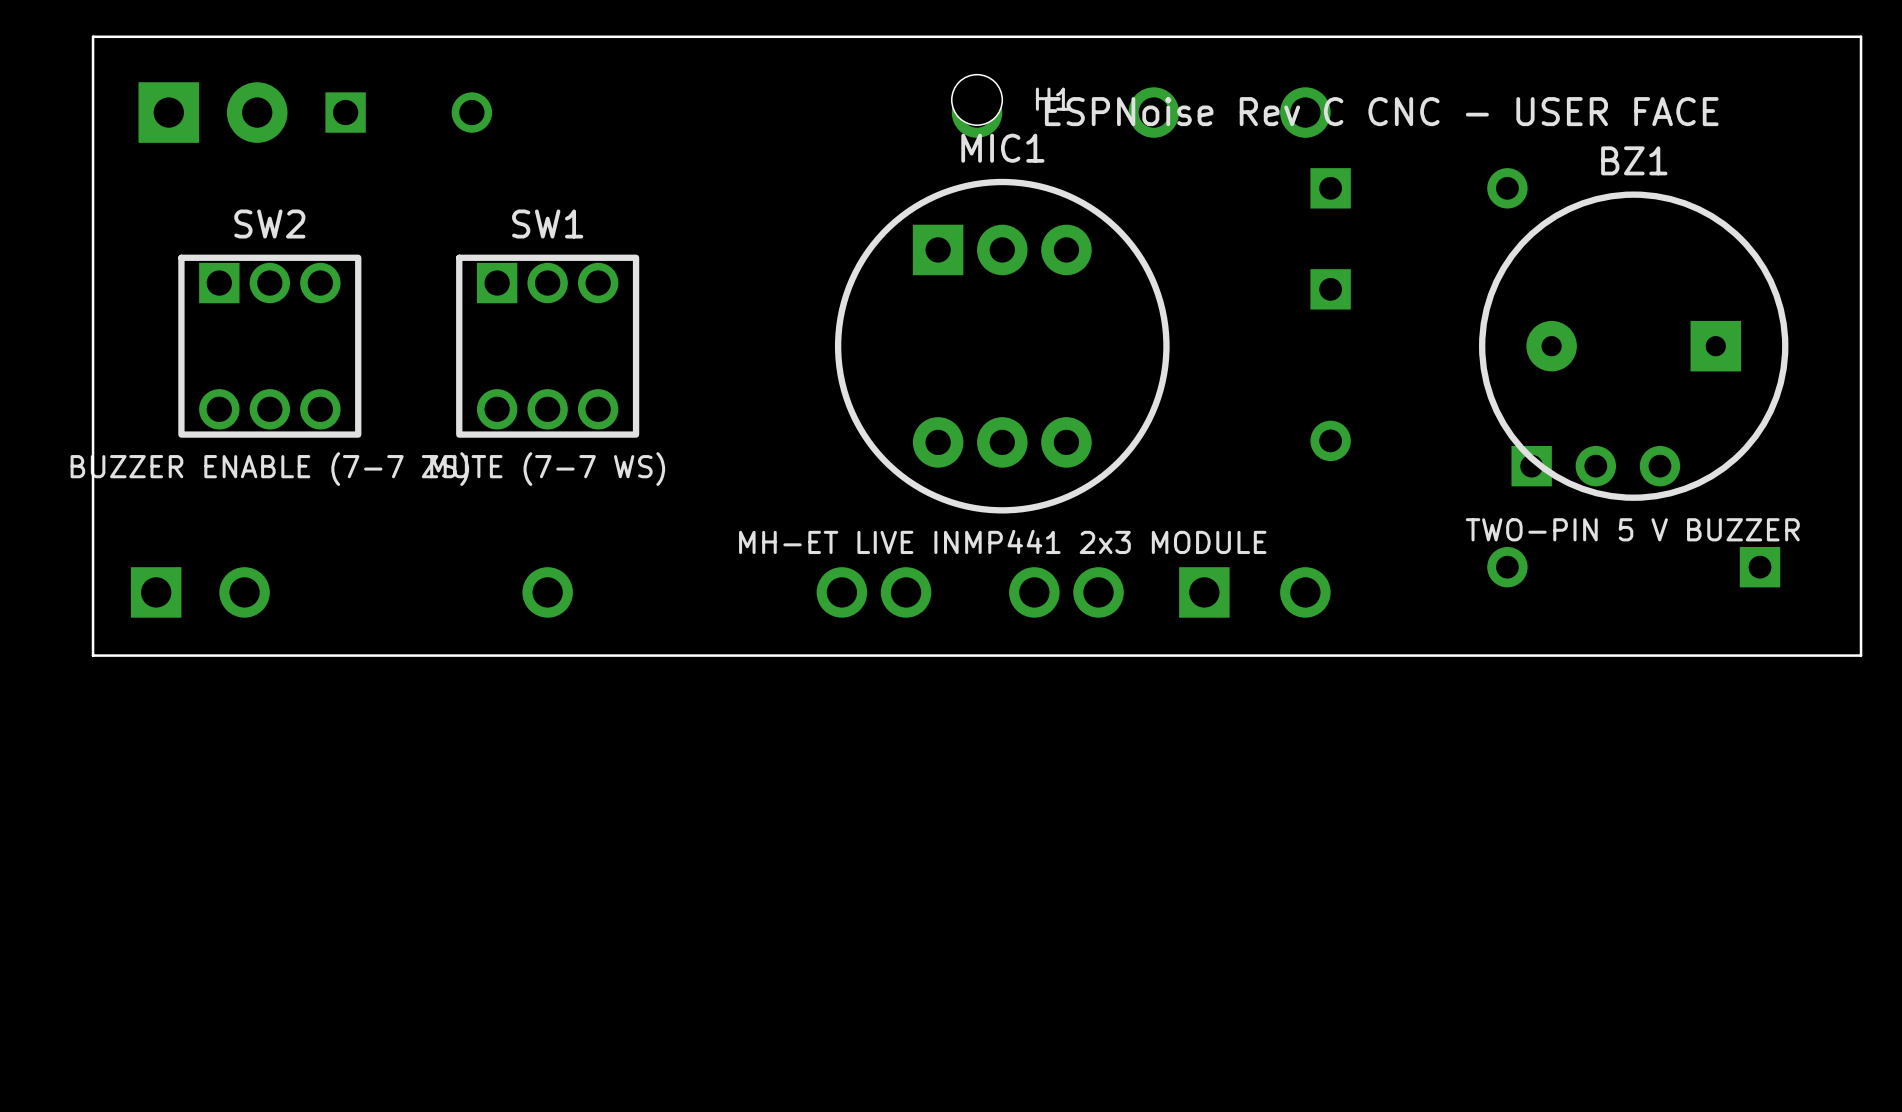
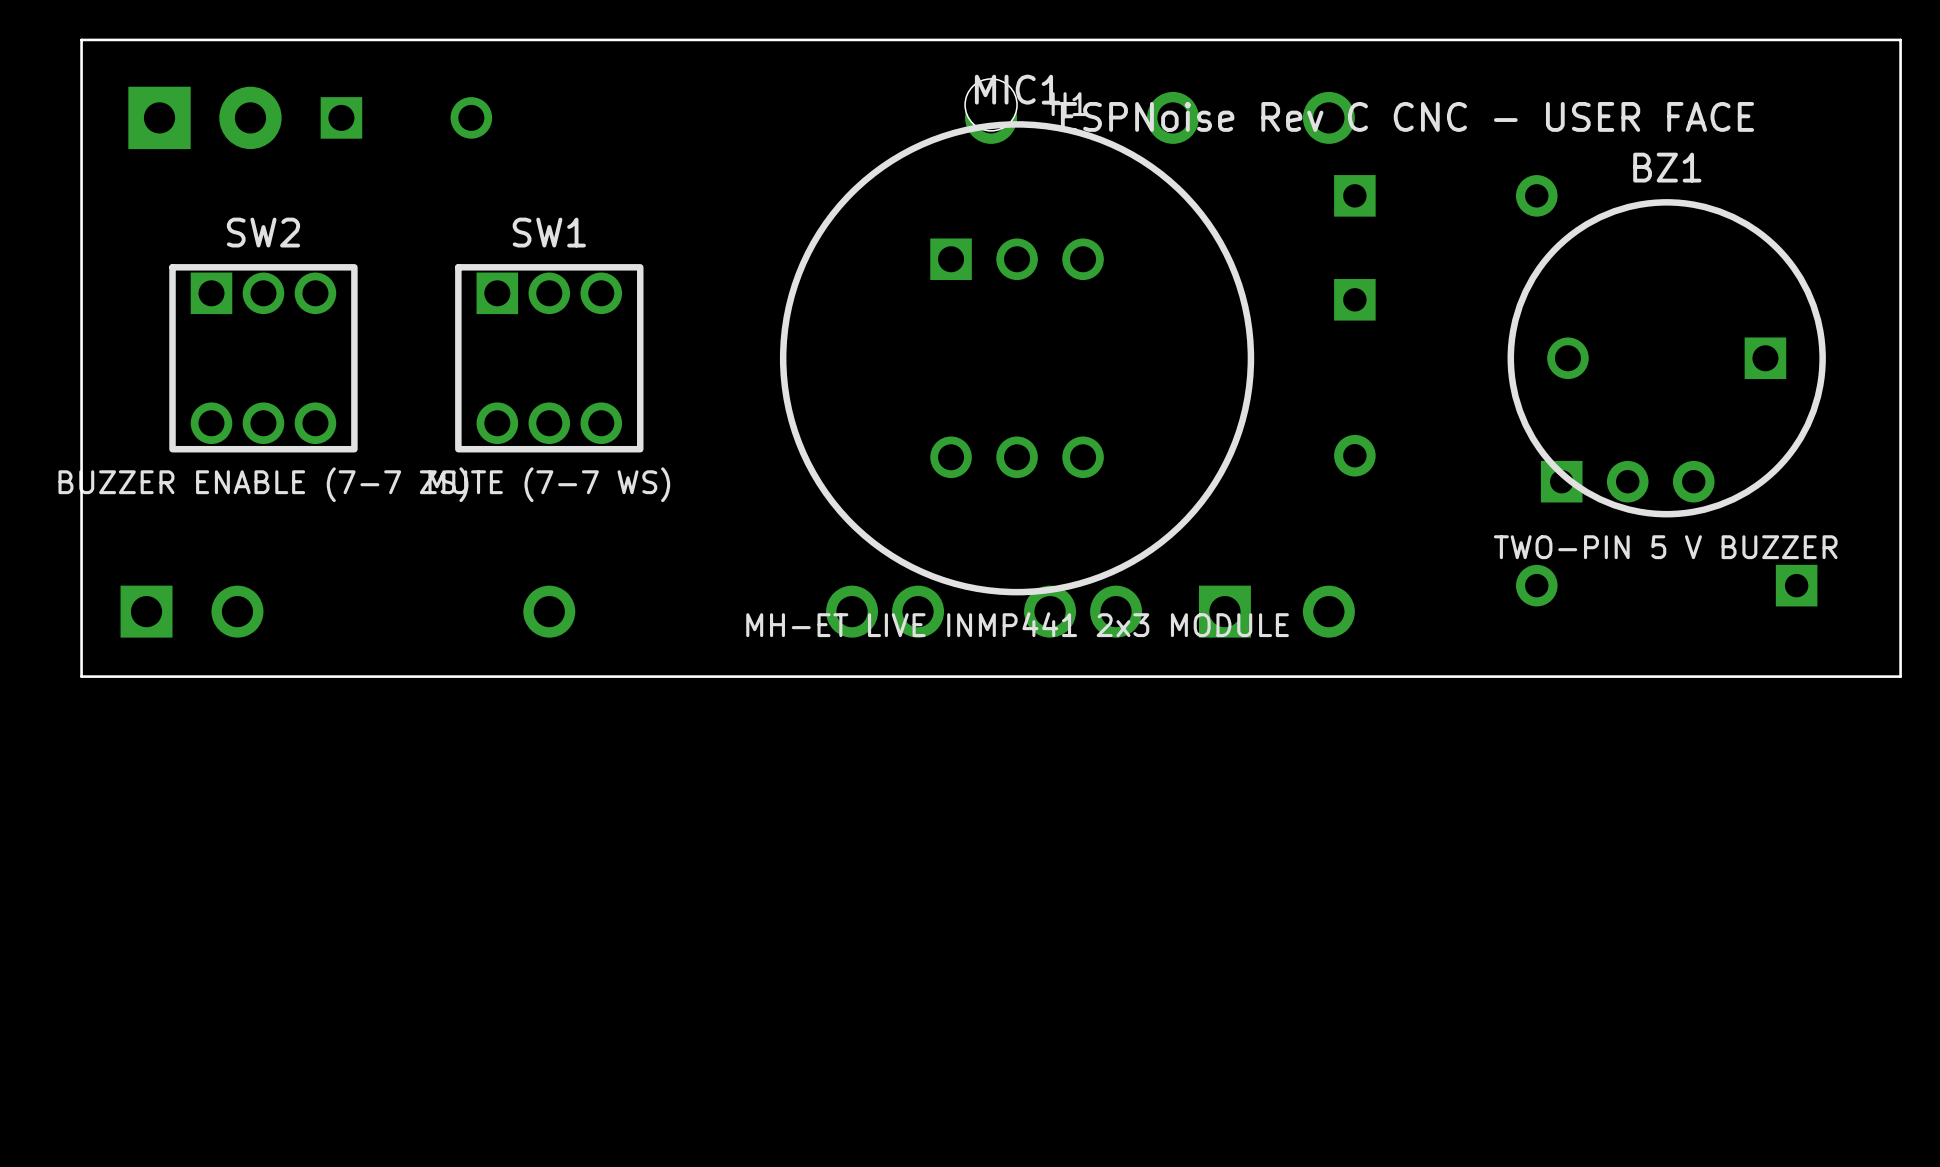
MIC1 name position: MIC1 (1002, 148) -> MIC1 (1017, 89)
MIC1 footprint: [834, 178, 1170, 514] -> [779, 121, 1255, 596]
BZ1 footprint: [1479, 191, 1789, 501] -> [1507, 199, 1826, 518]
MIC1 value position: MH-ET LIVE INMP441 2x3 MODULE (1002, 541) -> MH-ET LIVE INMP441 2x3 MODULE (1017, 624)

